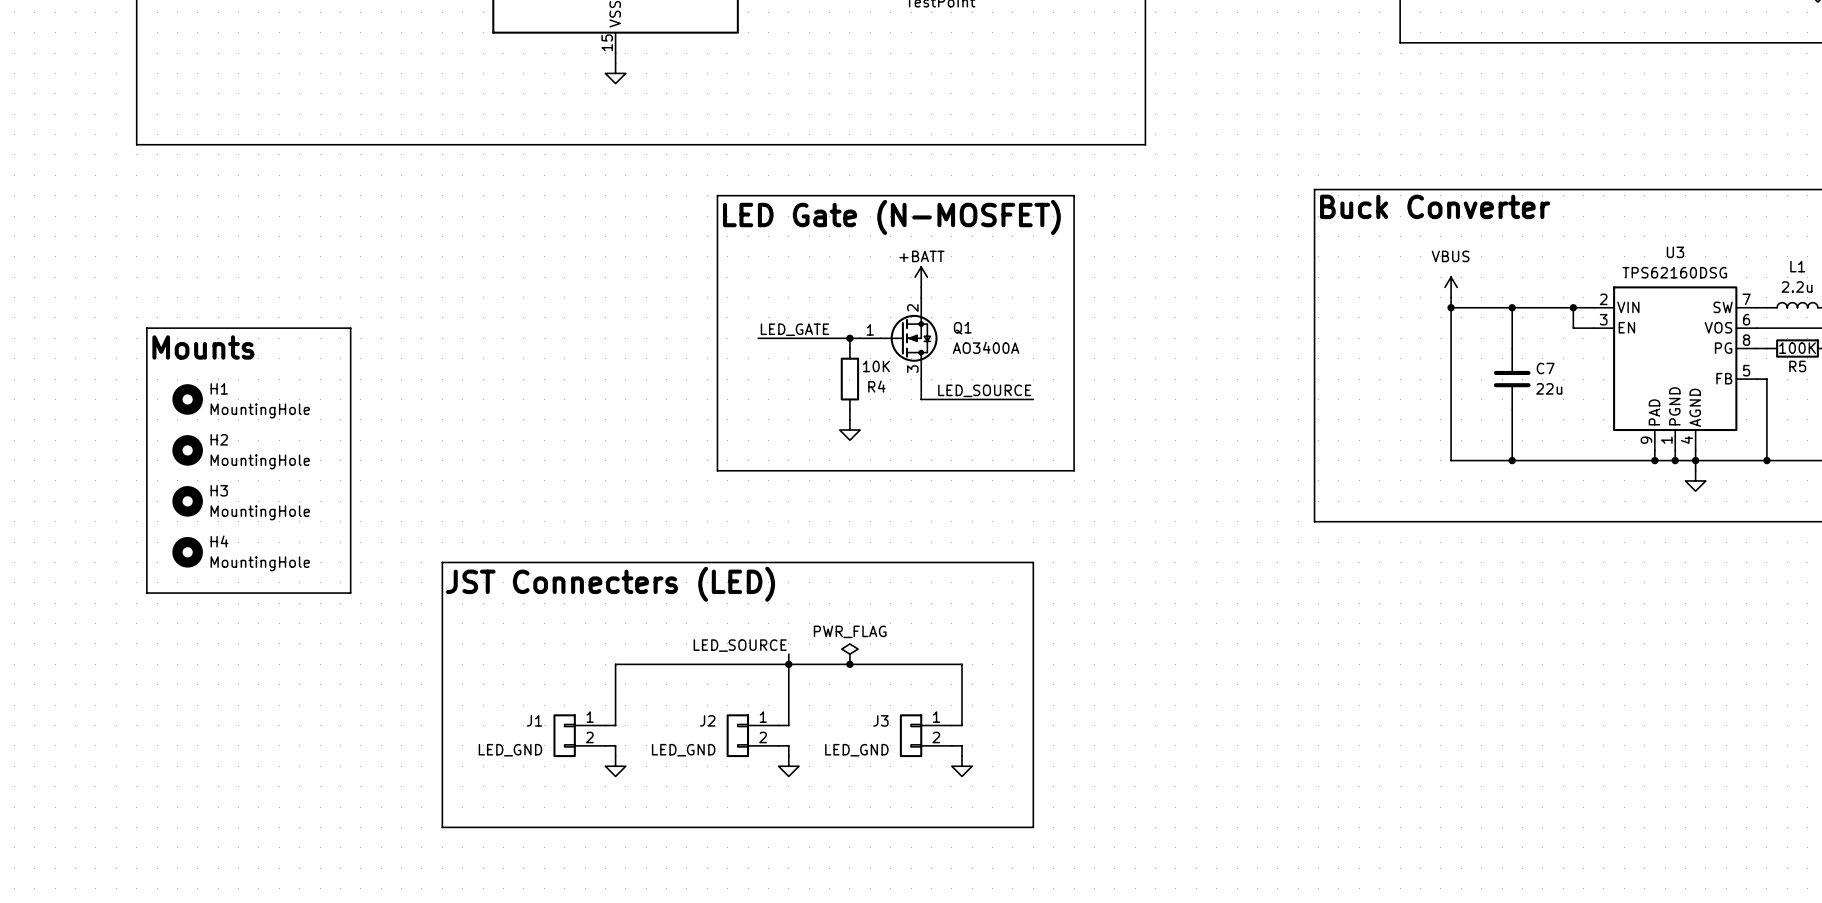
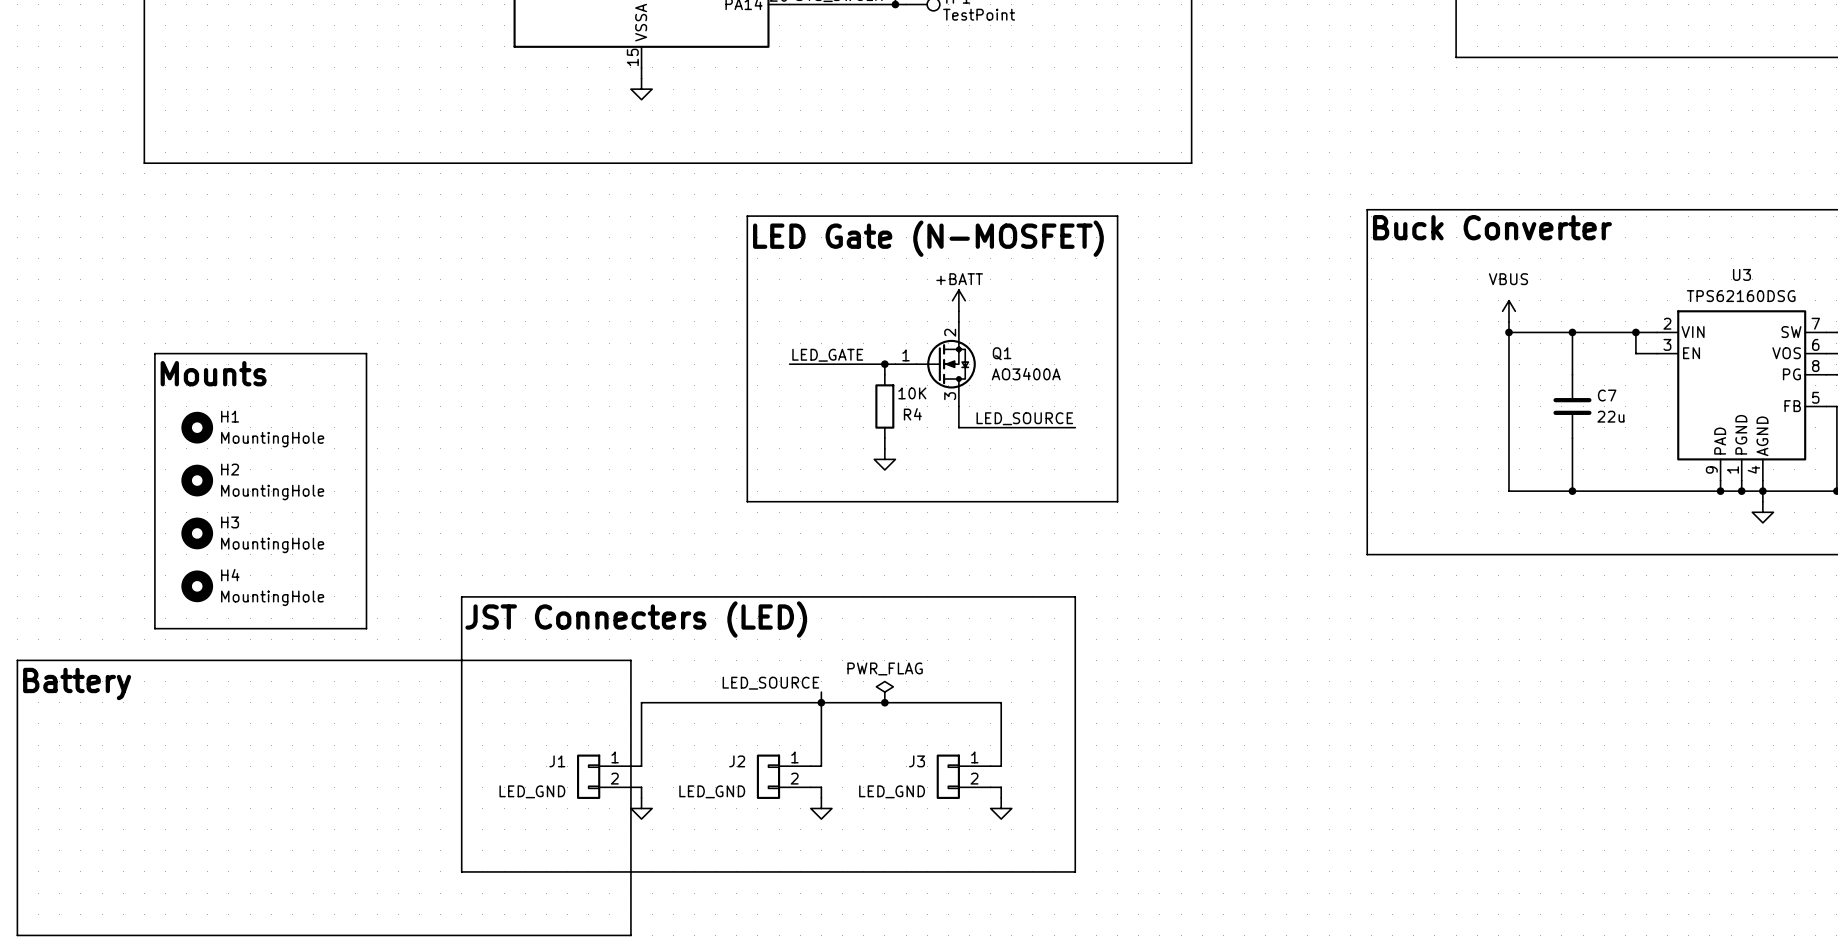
line: none -> (17, 660) (630, 660) (630, 935) (17, 935) (17, 660)
text: none -> Battery (77, 684)

